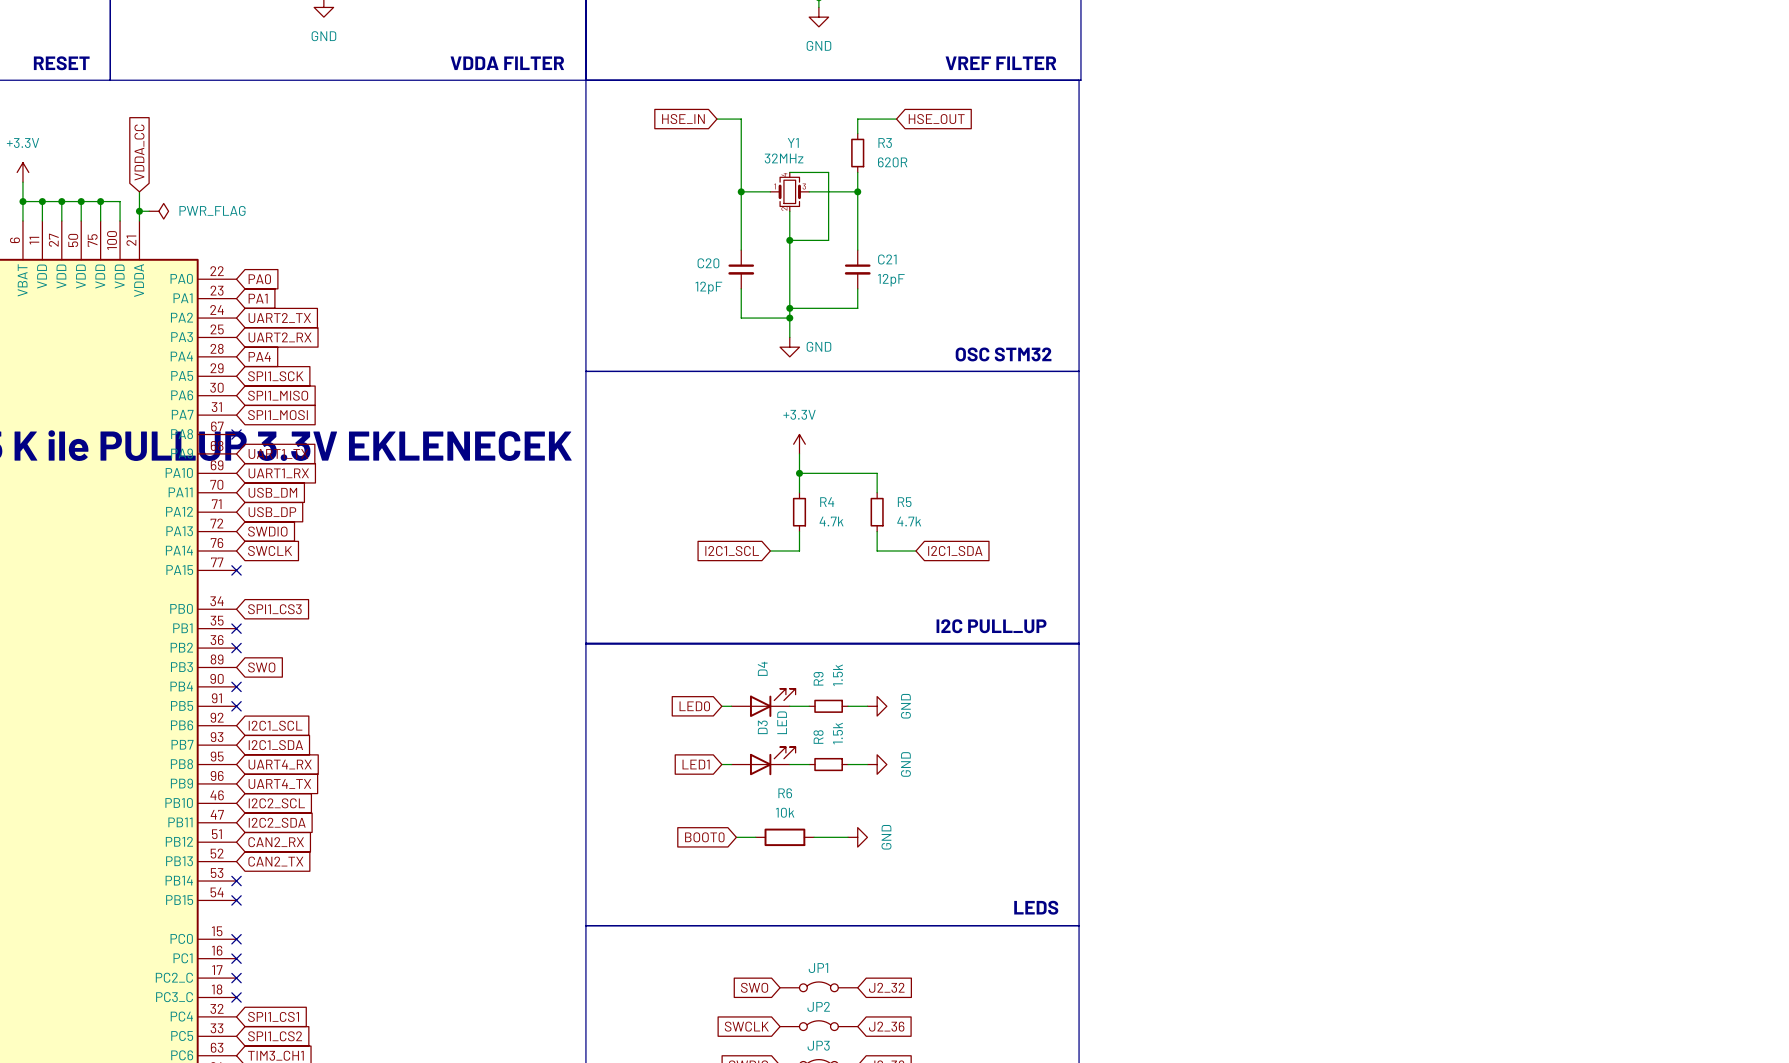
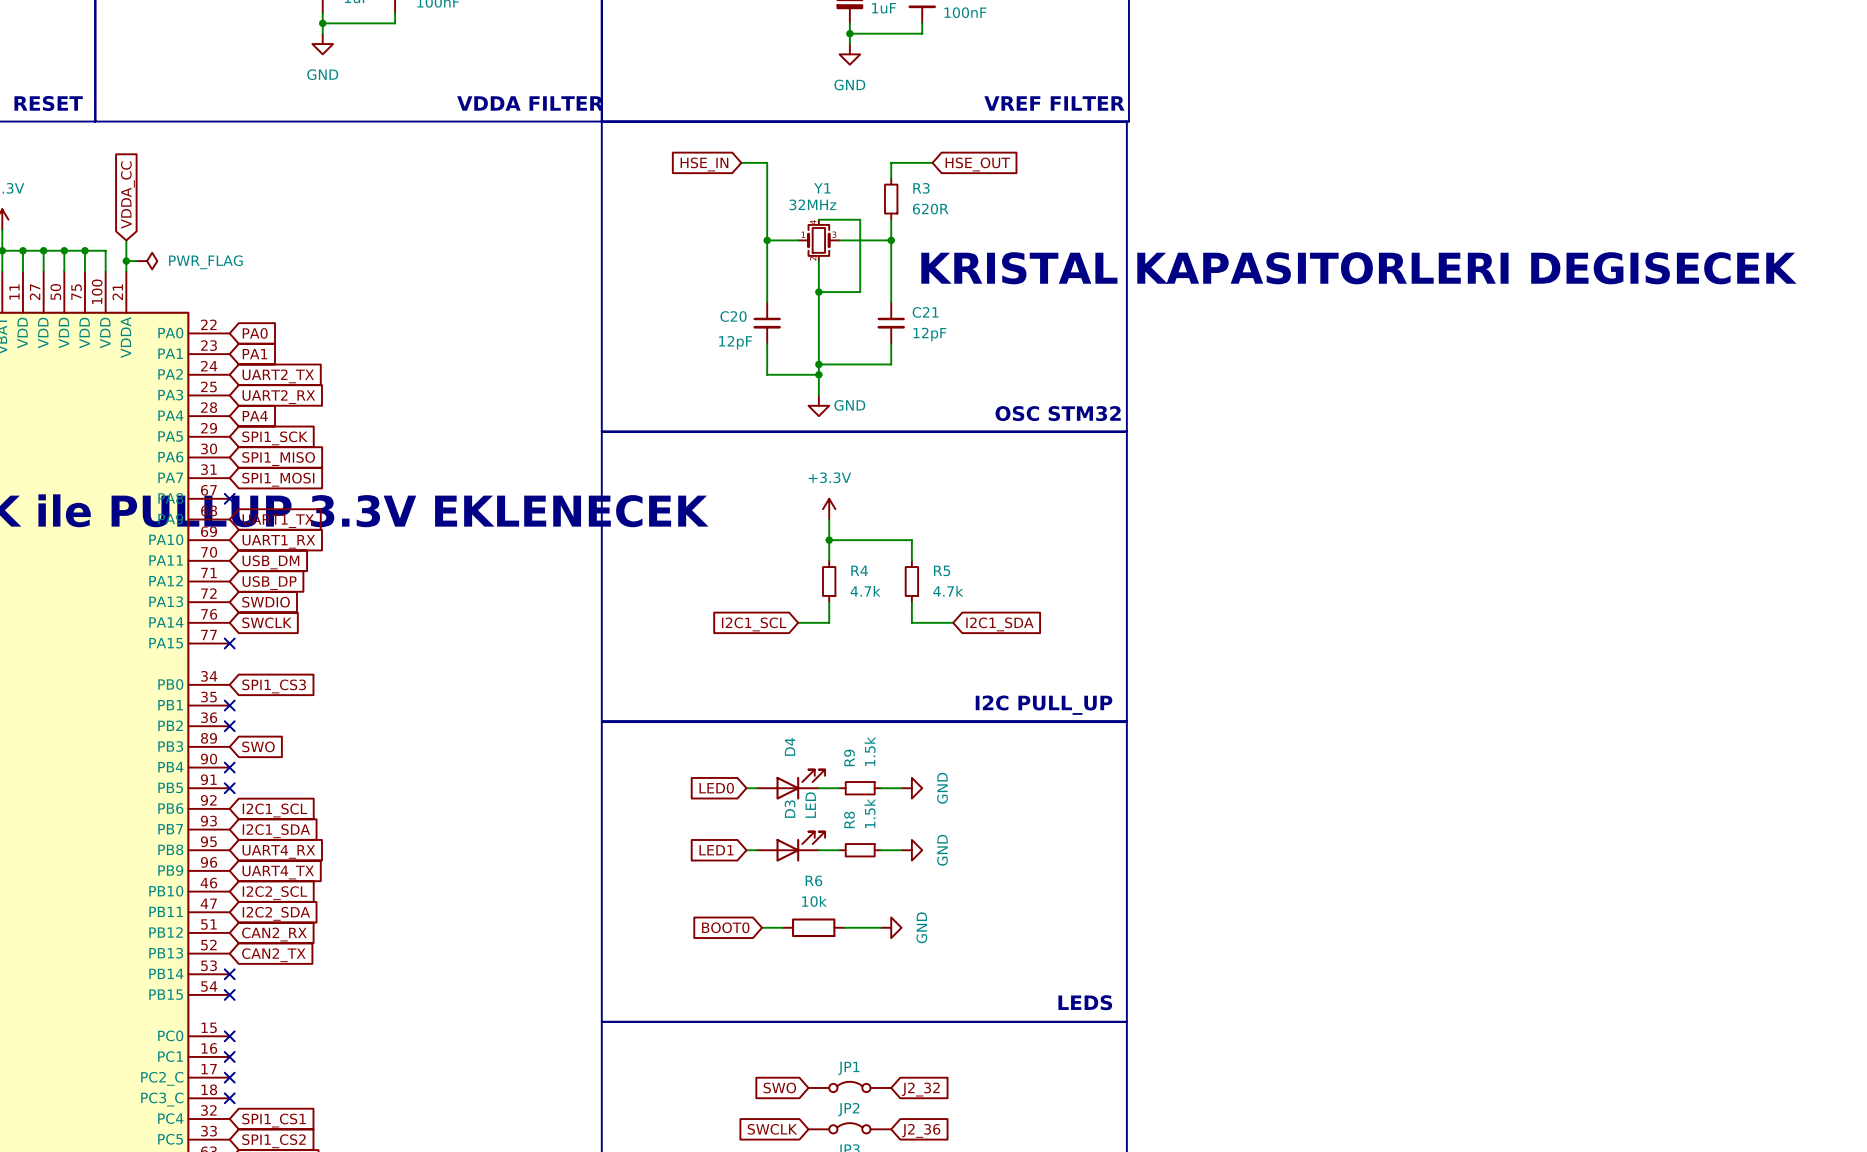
text: none -> KRISTAL KAPASITORLERI DEGISECEK (1358, 268)

